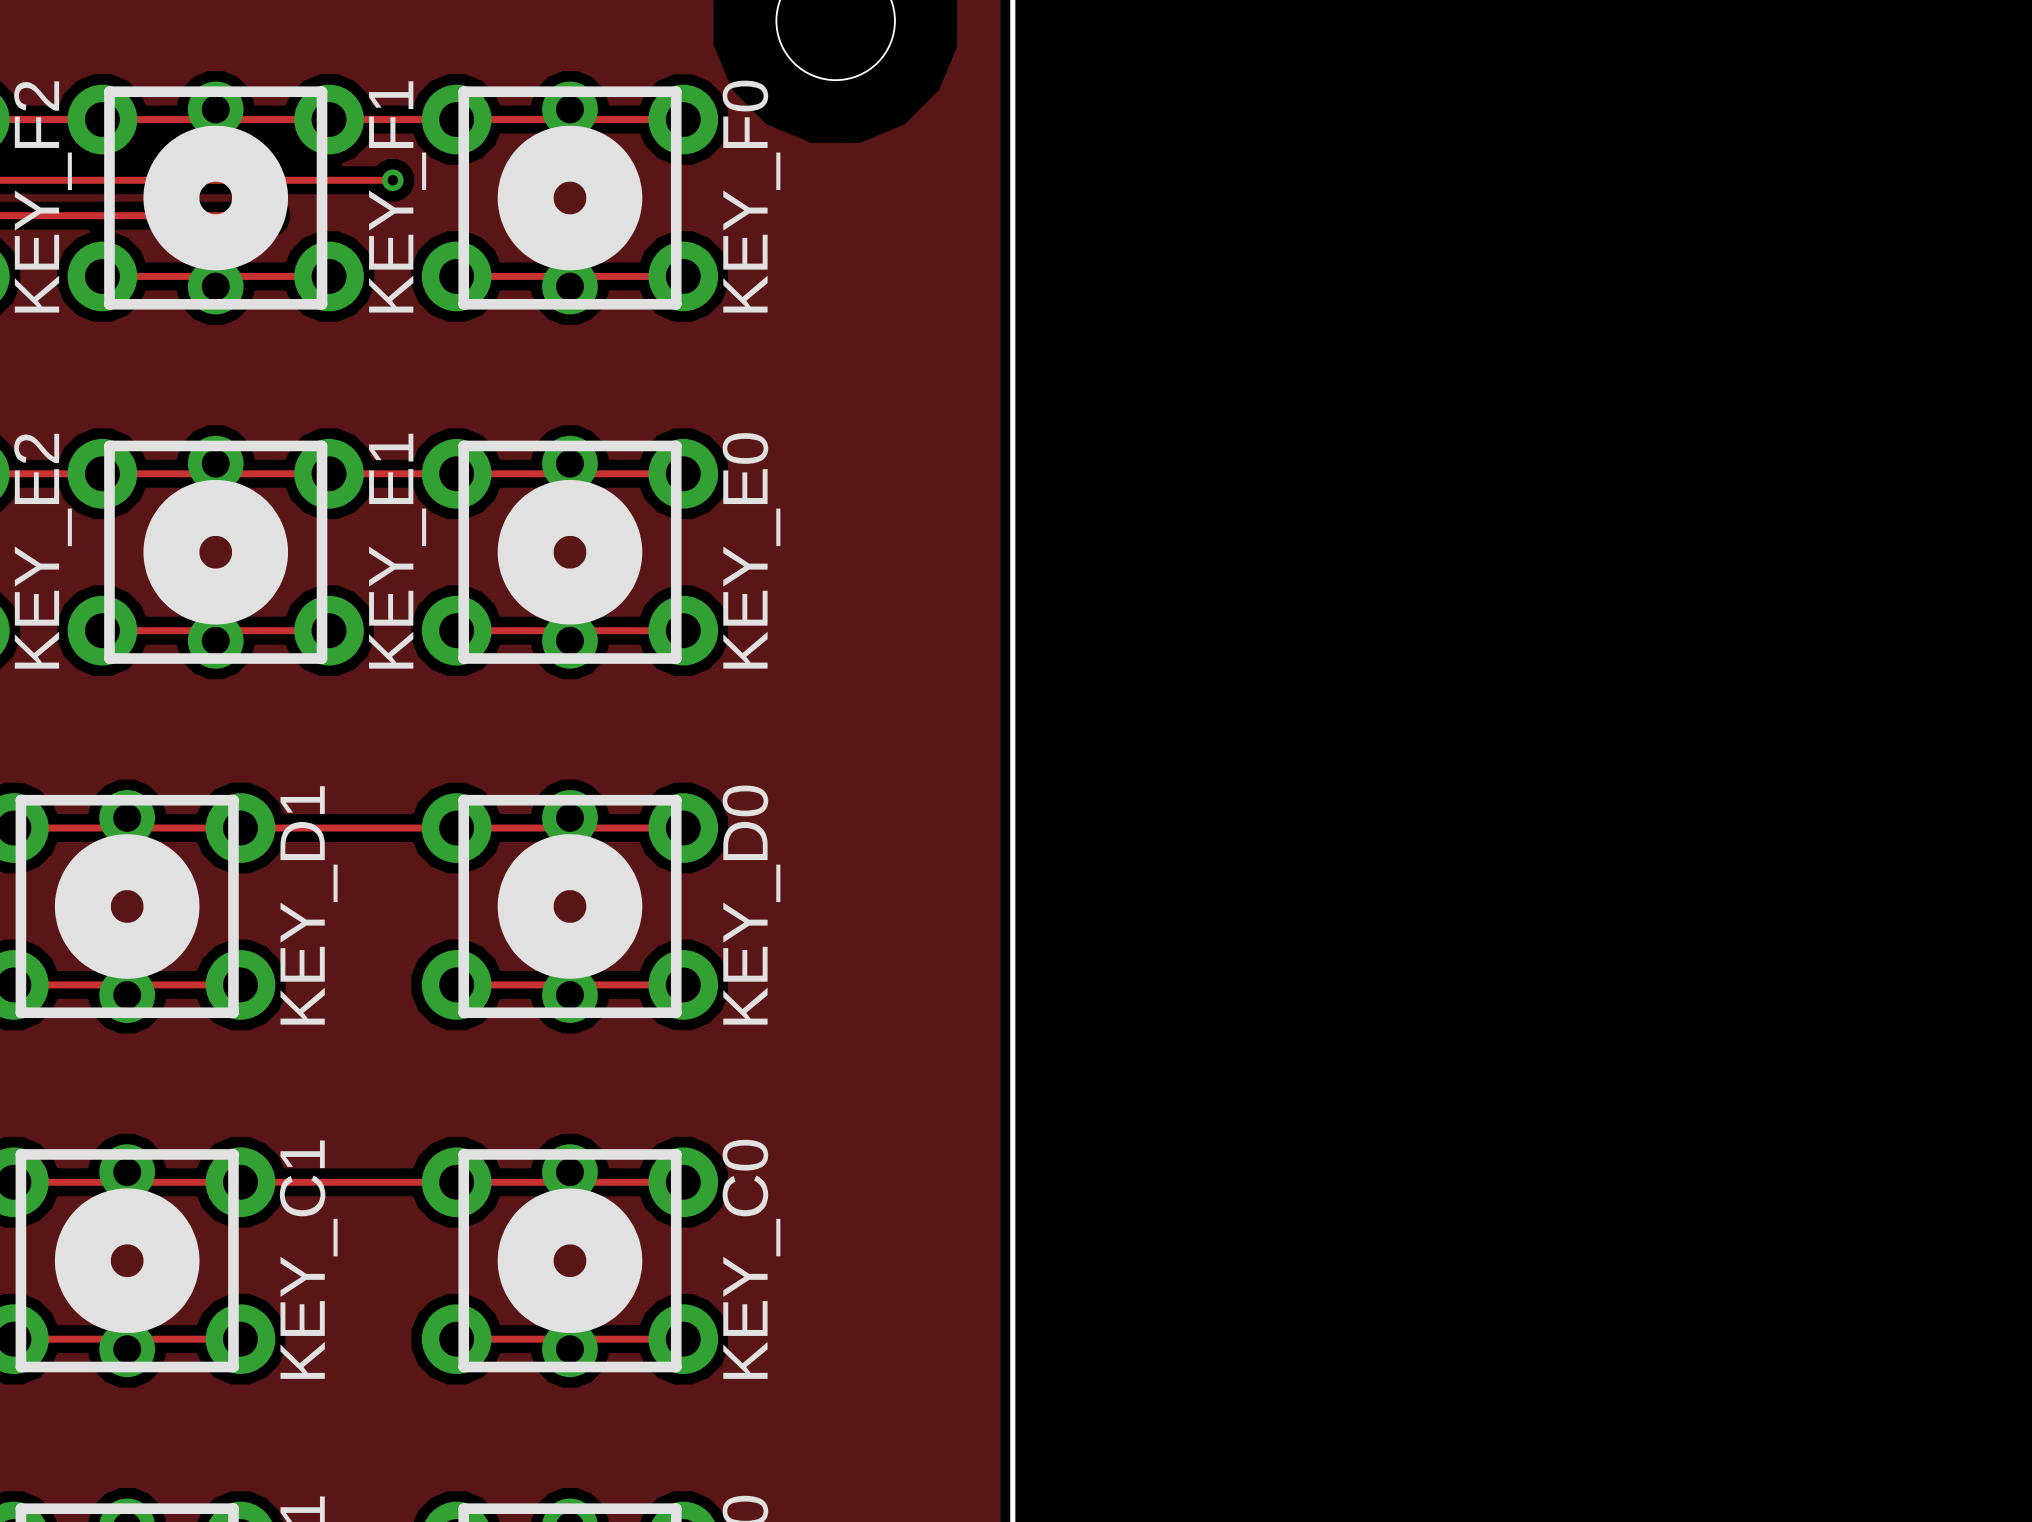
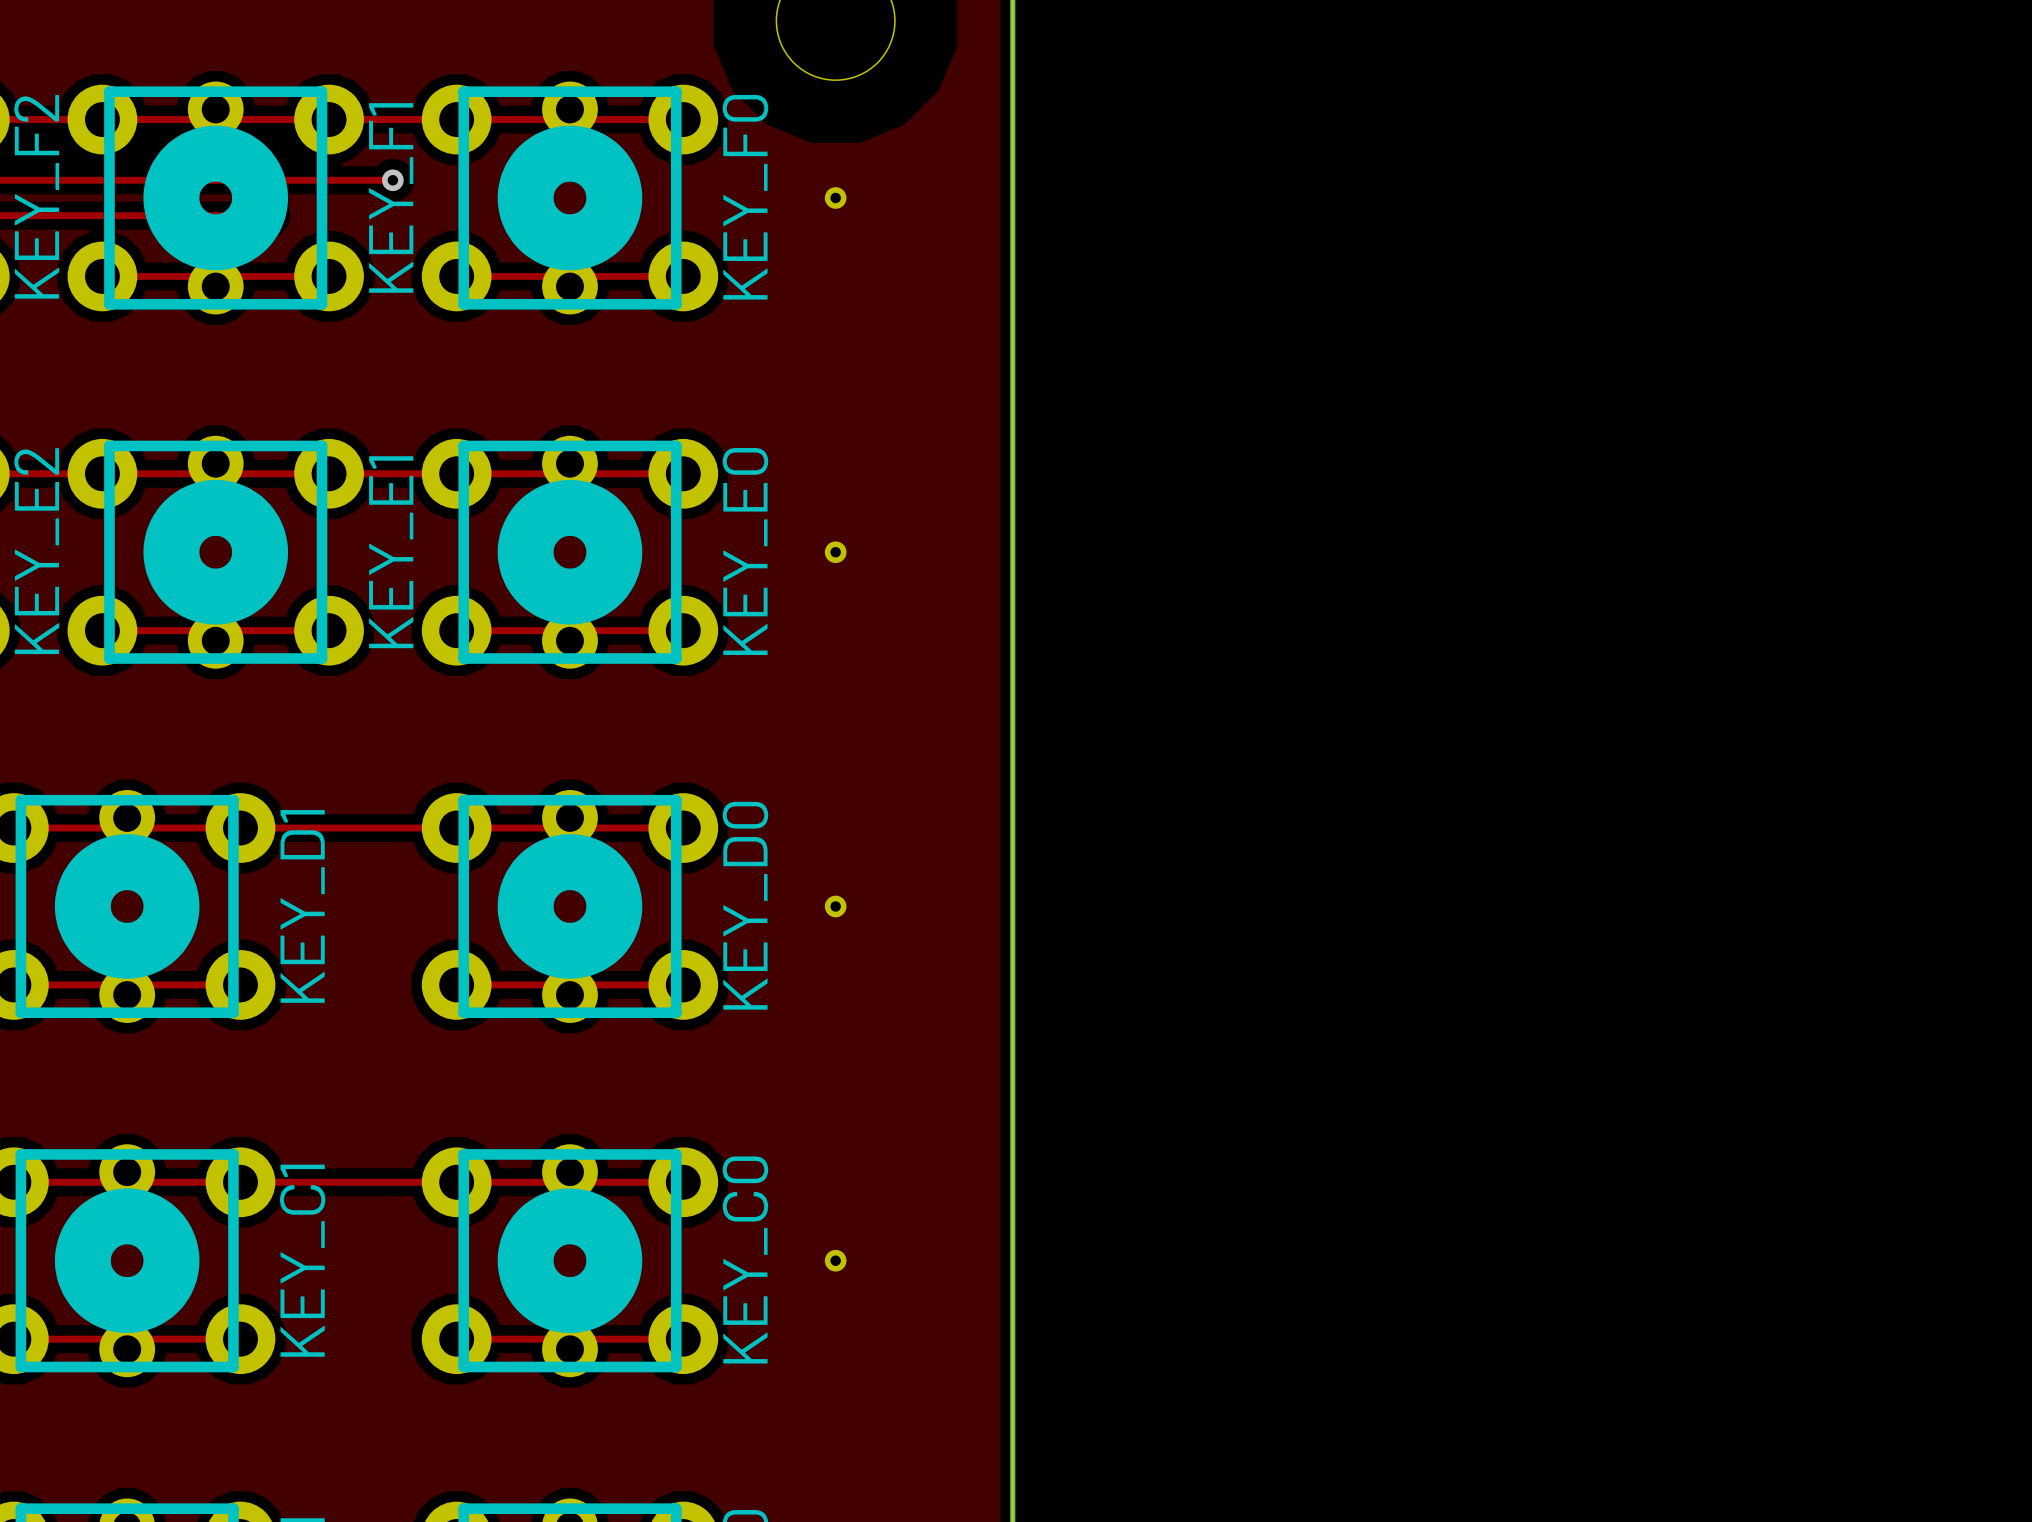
part: none -> (835, 197)
part: none -> (835, 552)
part: none -> (835, 906)
part: none -> (835, 1260)

